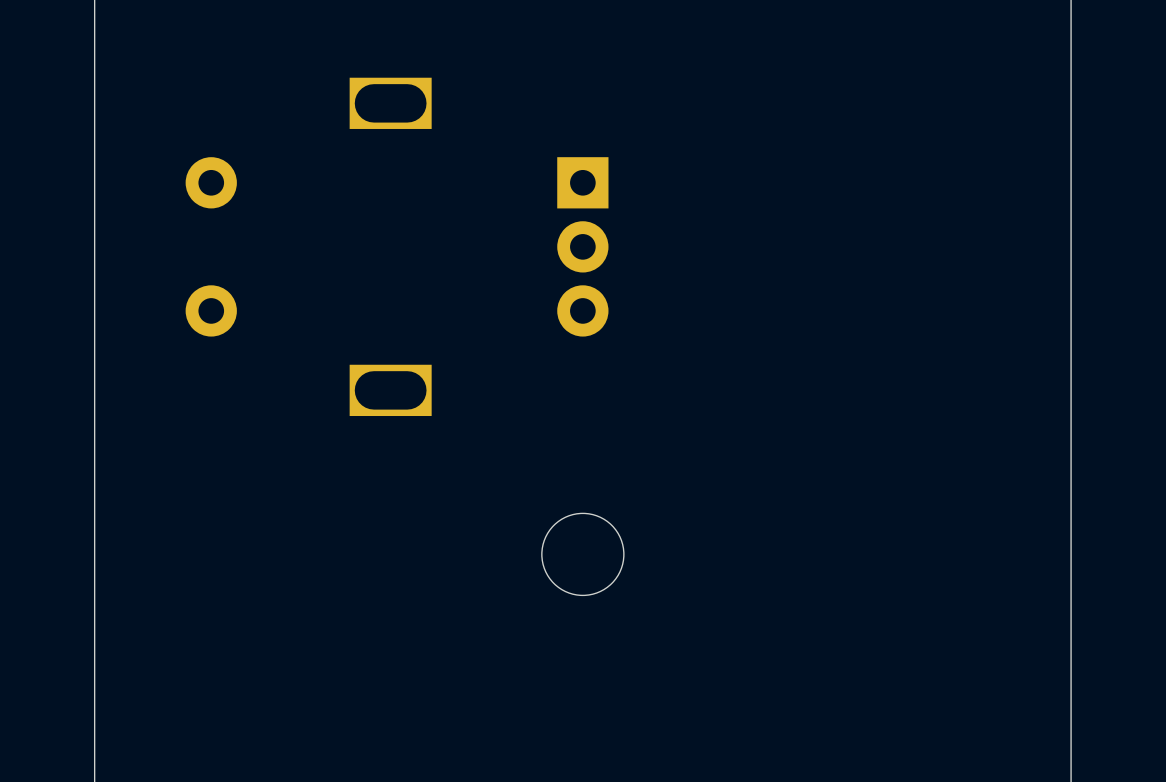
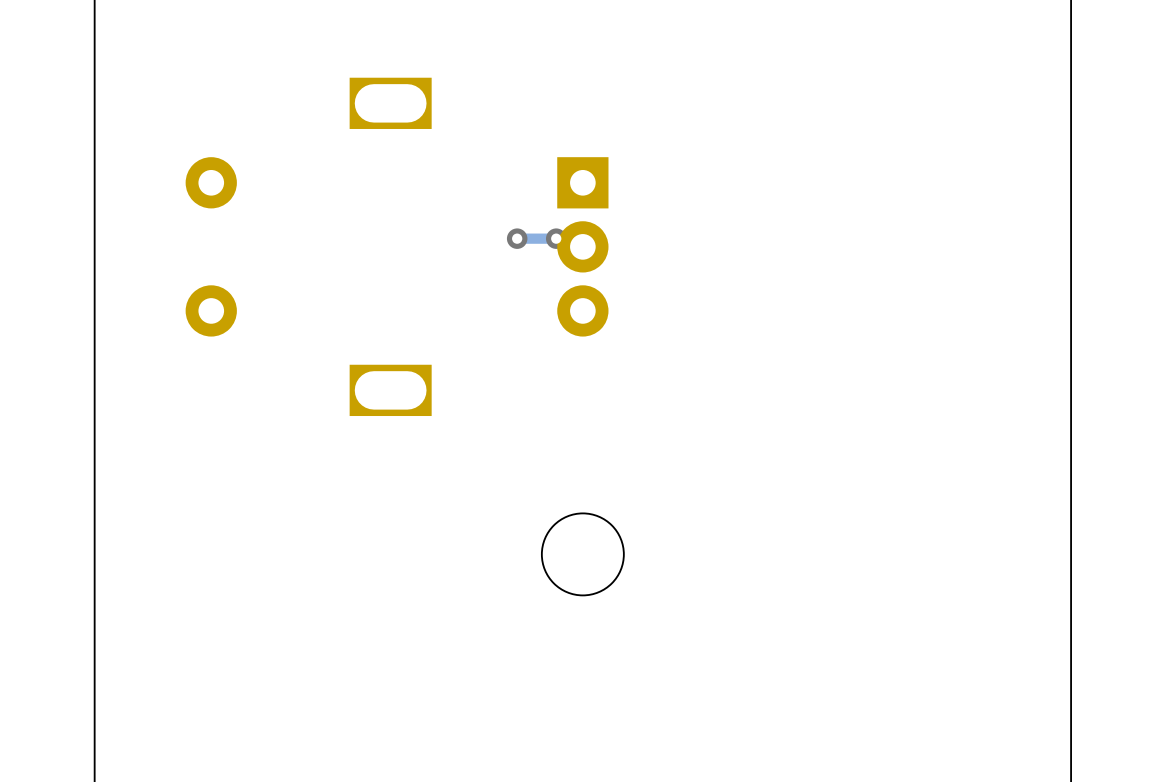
via: none -> (517, 238)
track: none -> (556, 238) (517, 238)
via: none -> (556, 238)

